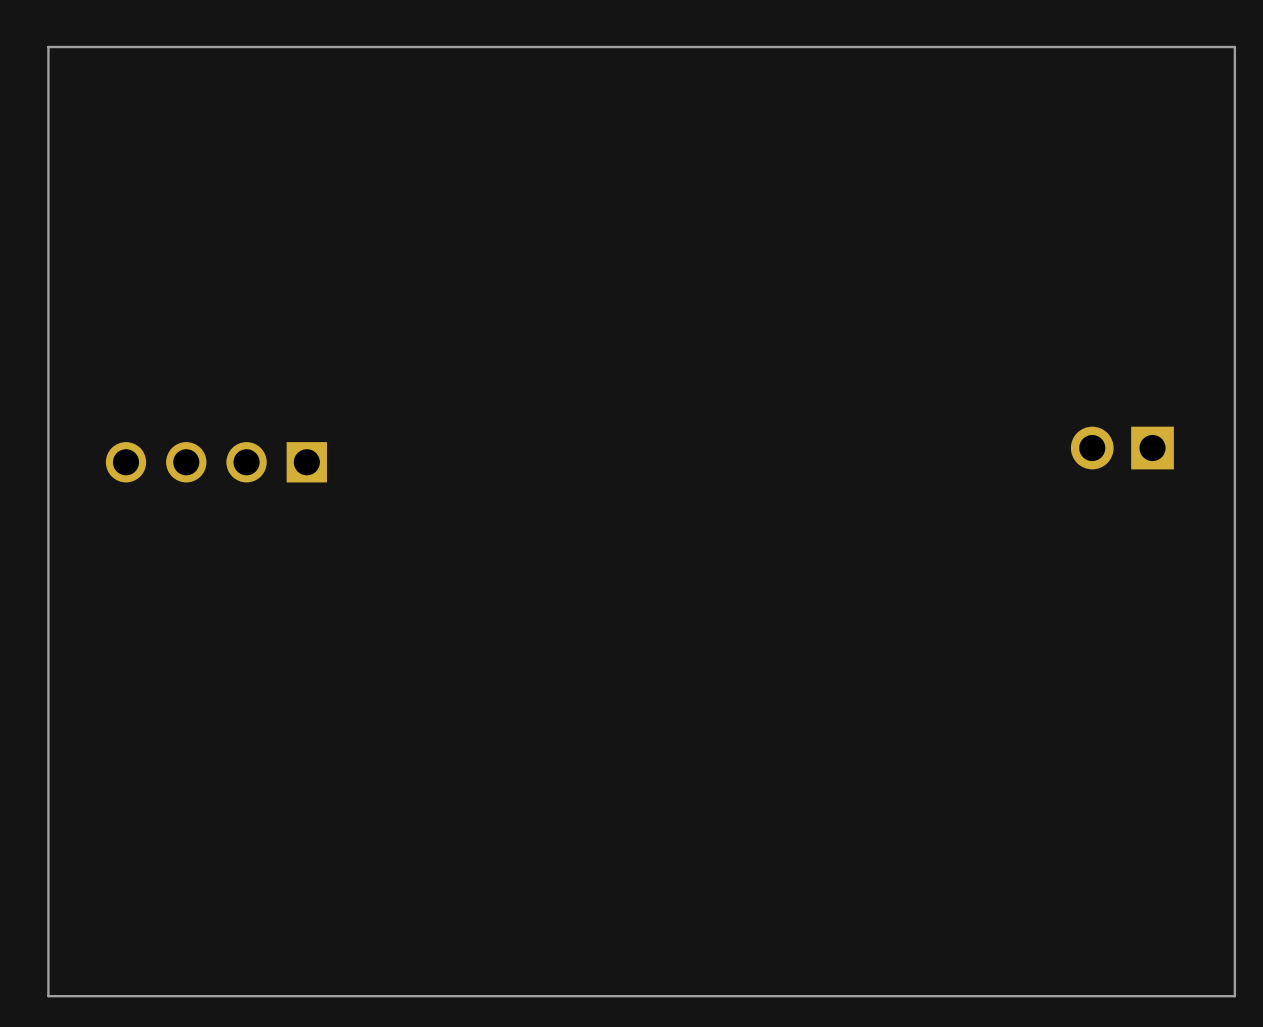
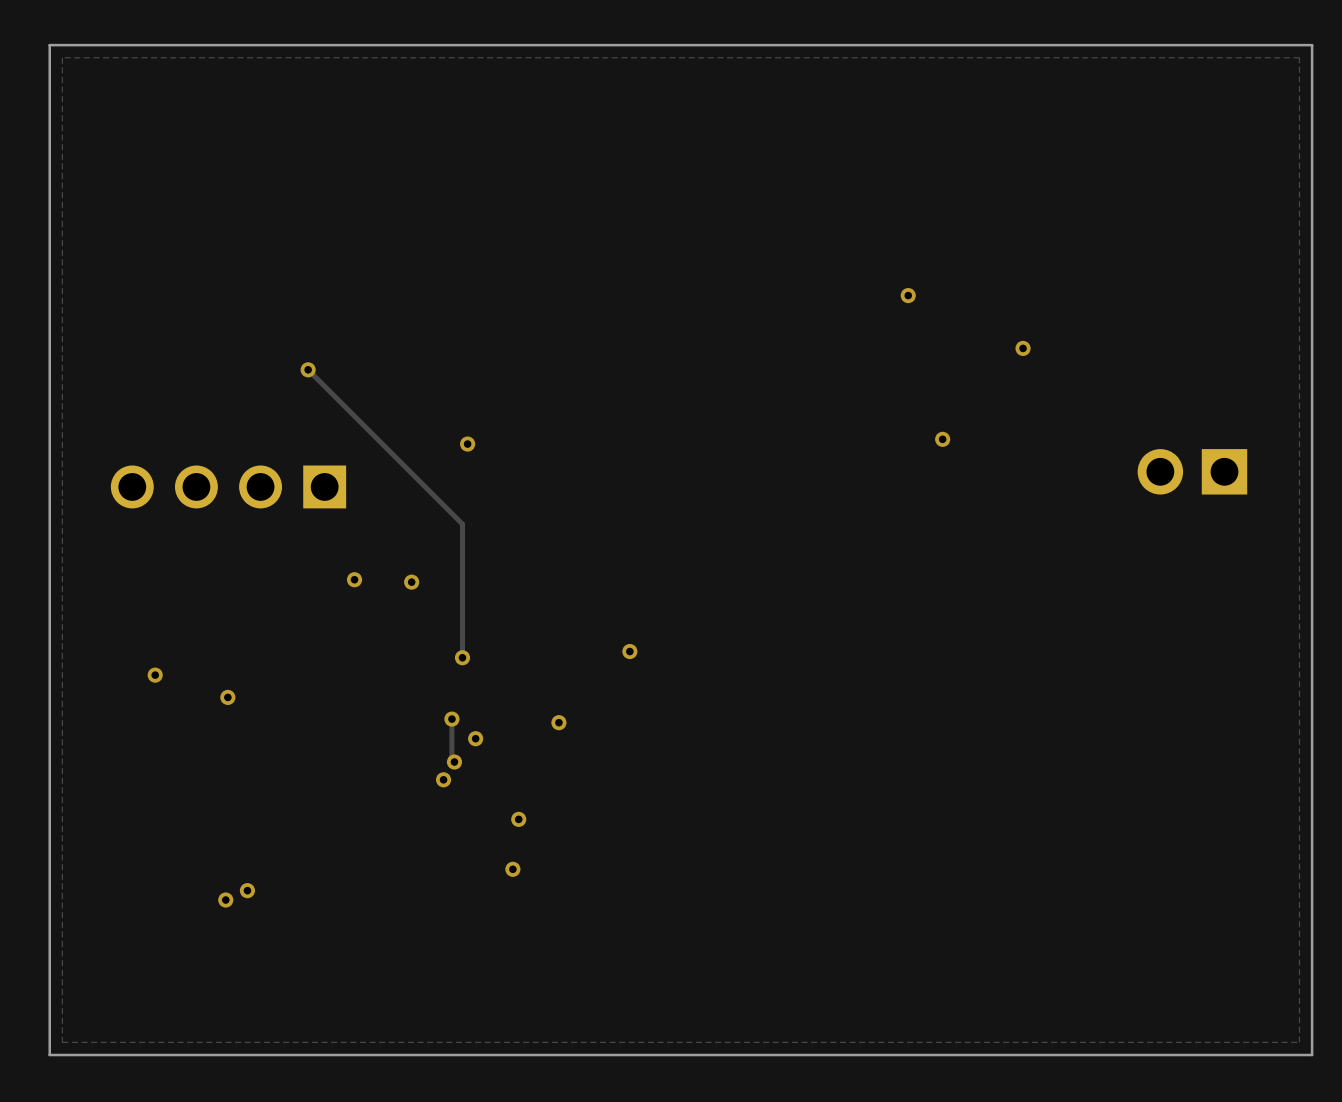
zone outline: none -> (1299, 57) (62, 57) (62, 1042) (1299, 1042) (1299, 57)
via: none -> (908, 295)
via: none -> (1023, 348)
track: none -> (308, 369) (462, 524) (462, 657)
via: none -> (308, 369)
via: none -> (942, 439)
via: none -> (467, 444)
via: none -> (354, 579)
via: none -> (411, 582)
via: none -> (629, 651)
via: none -> (462, 657)
via: none -> (155, 675)
via: none -> (227, 697)
track: none -> (451, 719) (451, 759)
via: none -> (451, 719)
via: none -> (558, 722)
via: none -> (475, 738)
via: none -> (454, 762)
via: none -> (443, 779)
via: none -> (518, 819)
via: none -> (512, 869)
via: none -> (247, 890)
via: none -> (225, 900)

